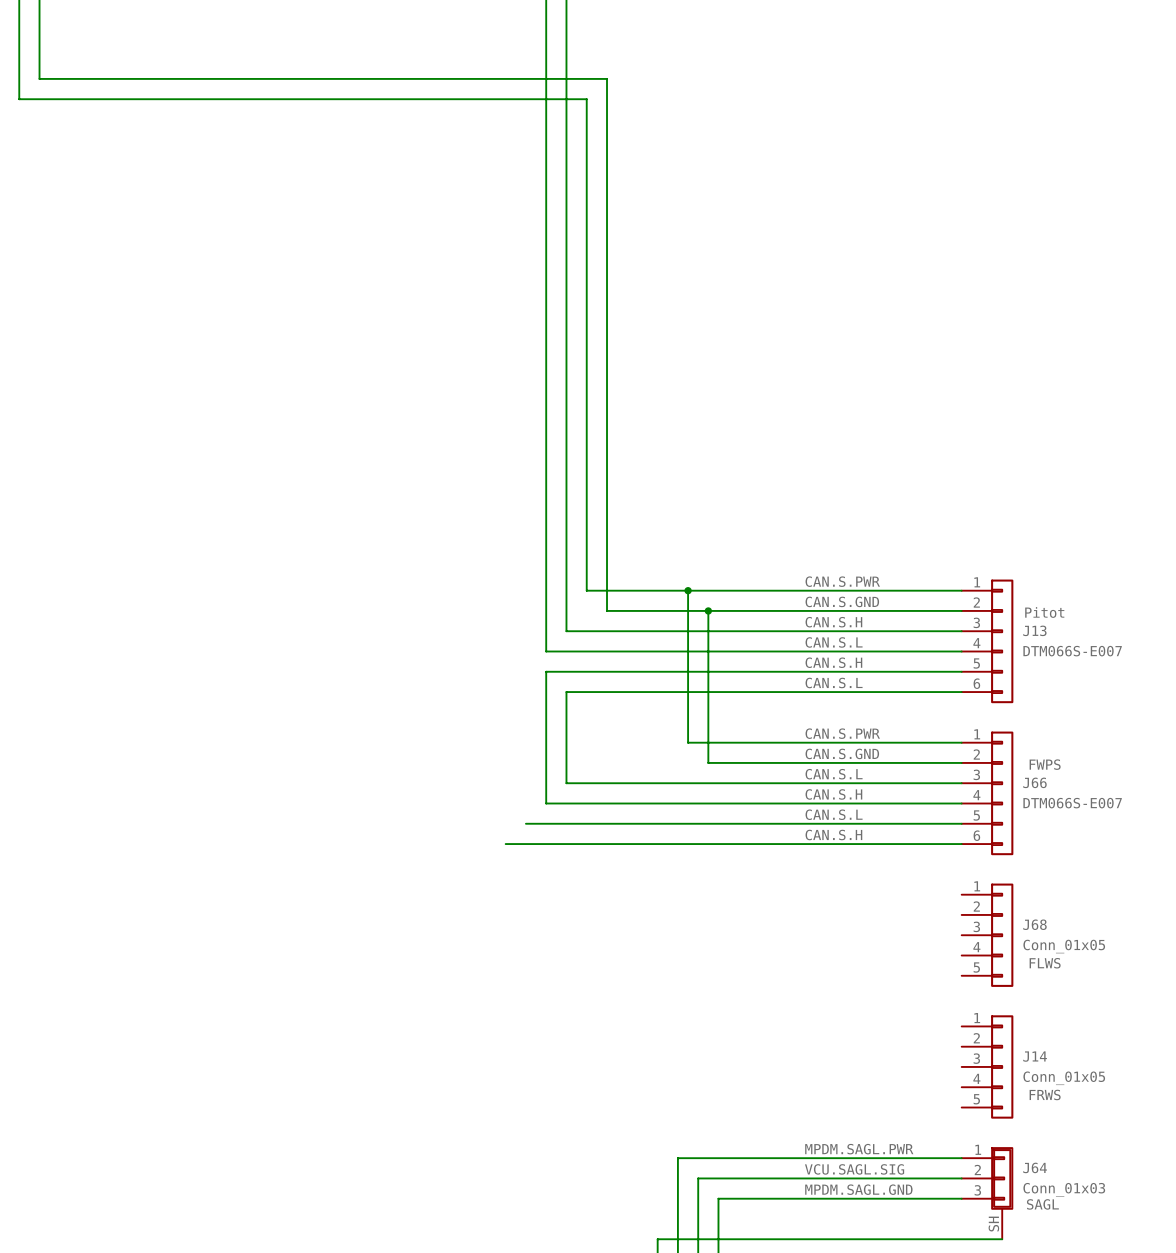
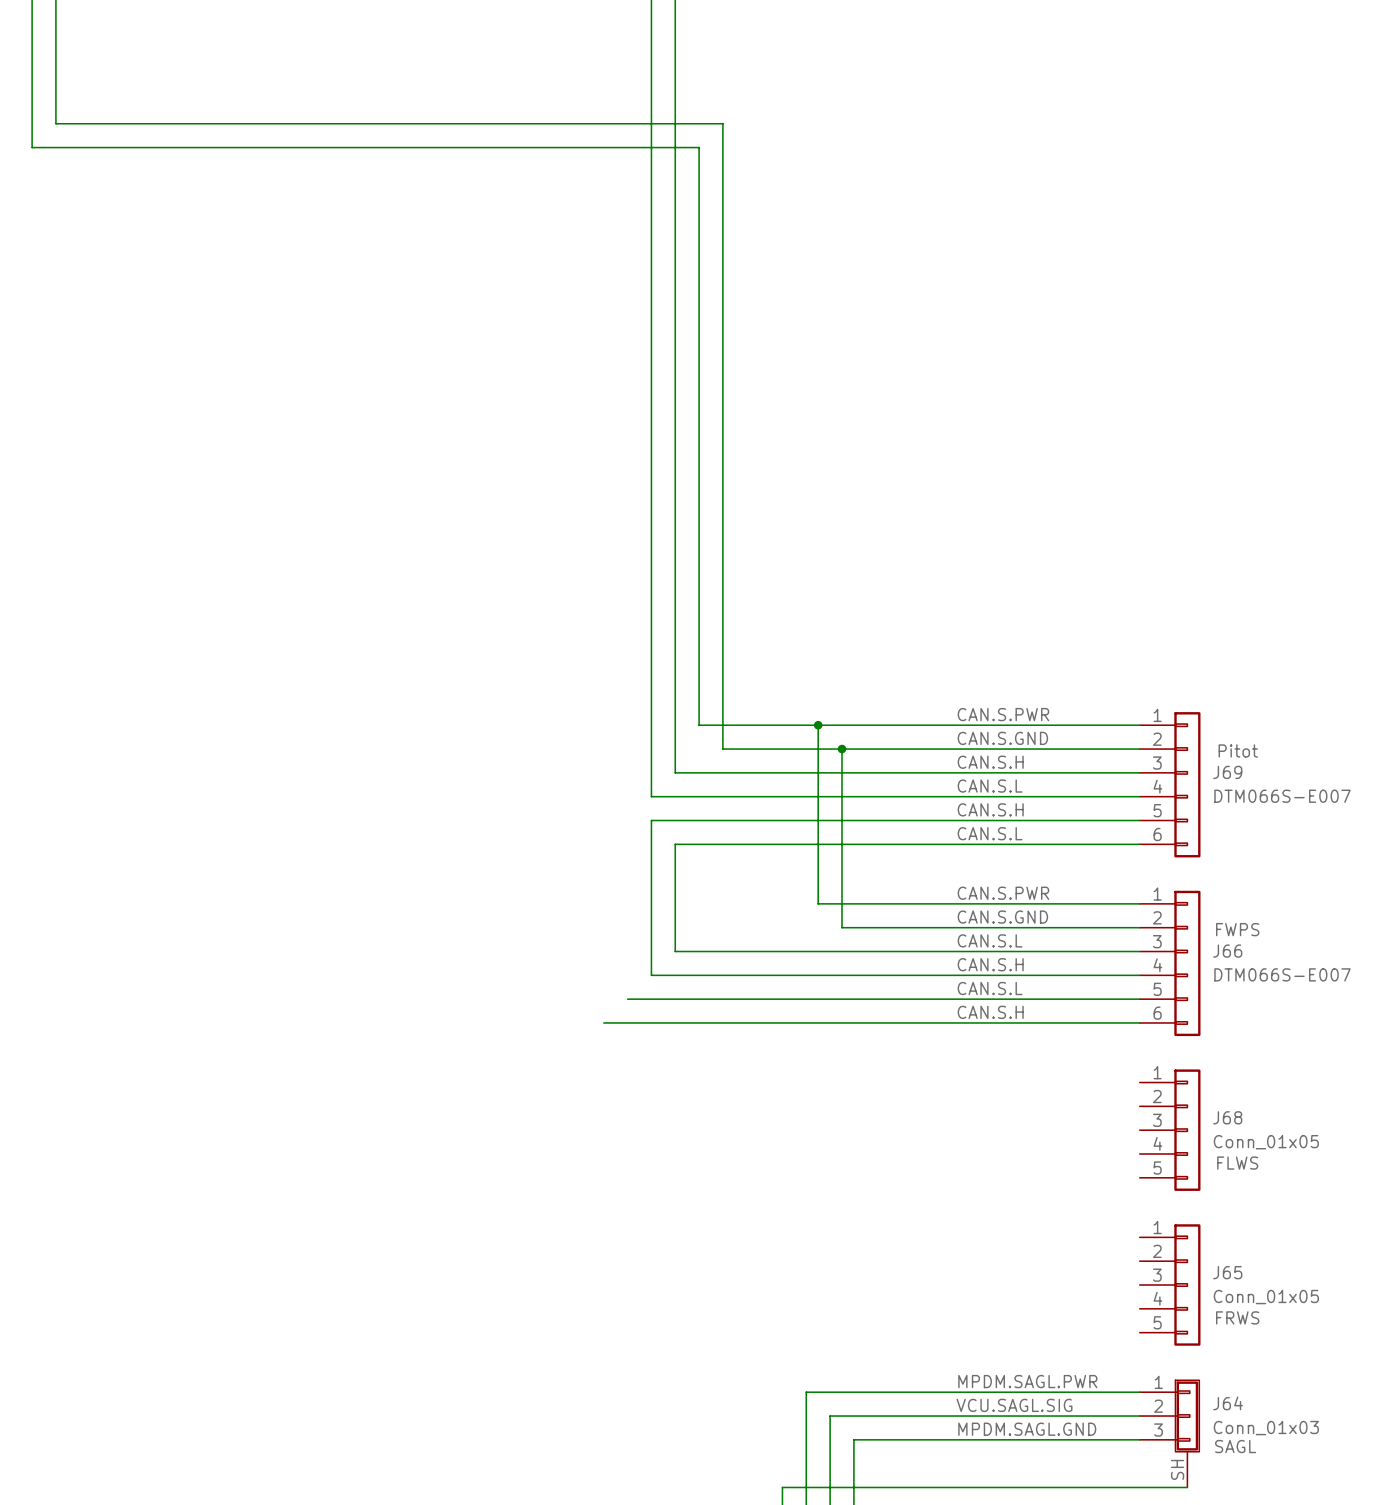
J13 name: J13 (1034, 630) -> J69 (1227, 772)
J14 name: J14 (1035, 1056) -> J65 (1227, 1272)

